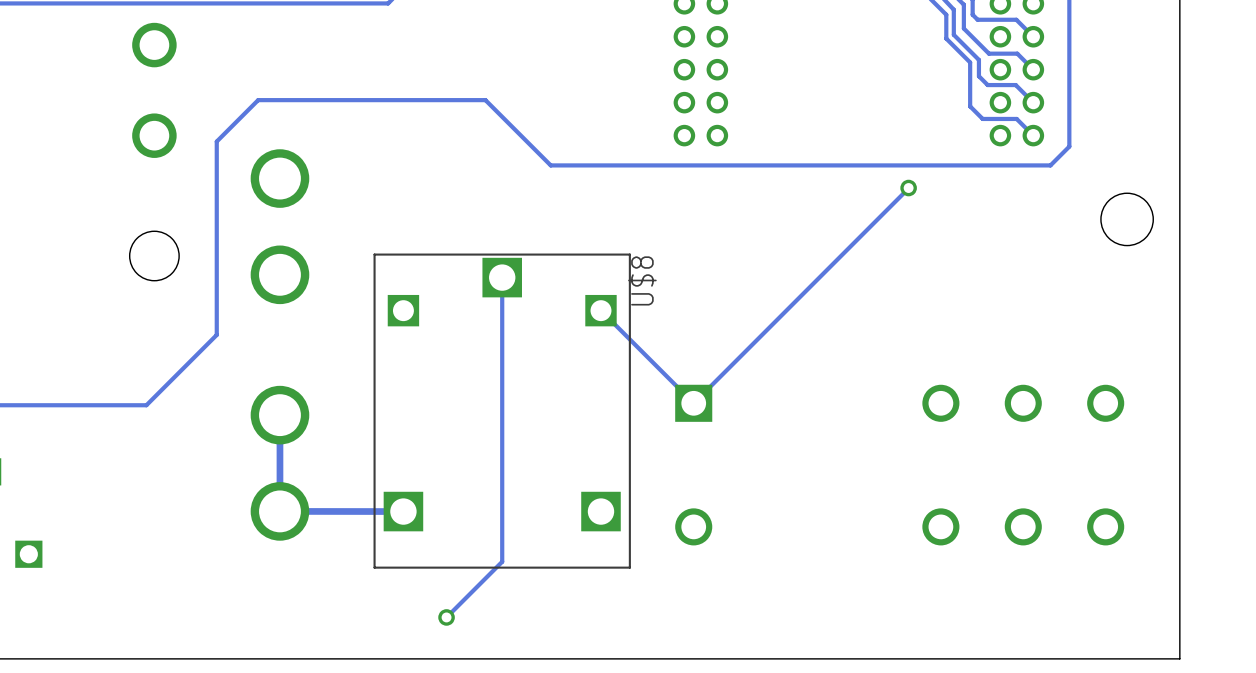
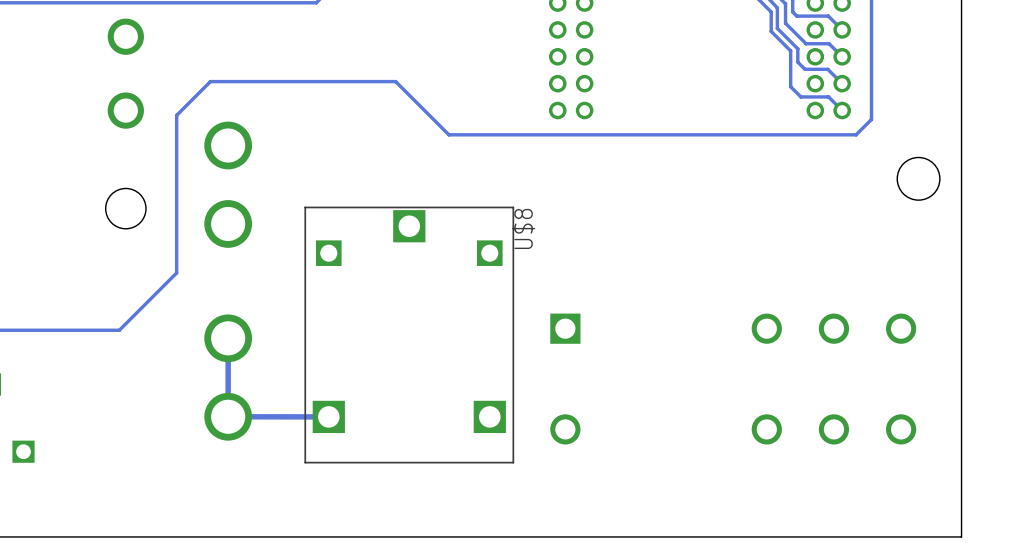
track: (908, 188) (693, 403) (601, 310) -> none
via: (908, 188) -> none
track: (502, 277) (502, 561) (446, 617) -> none
via: (446, 617) -> none

